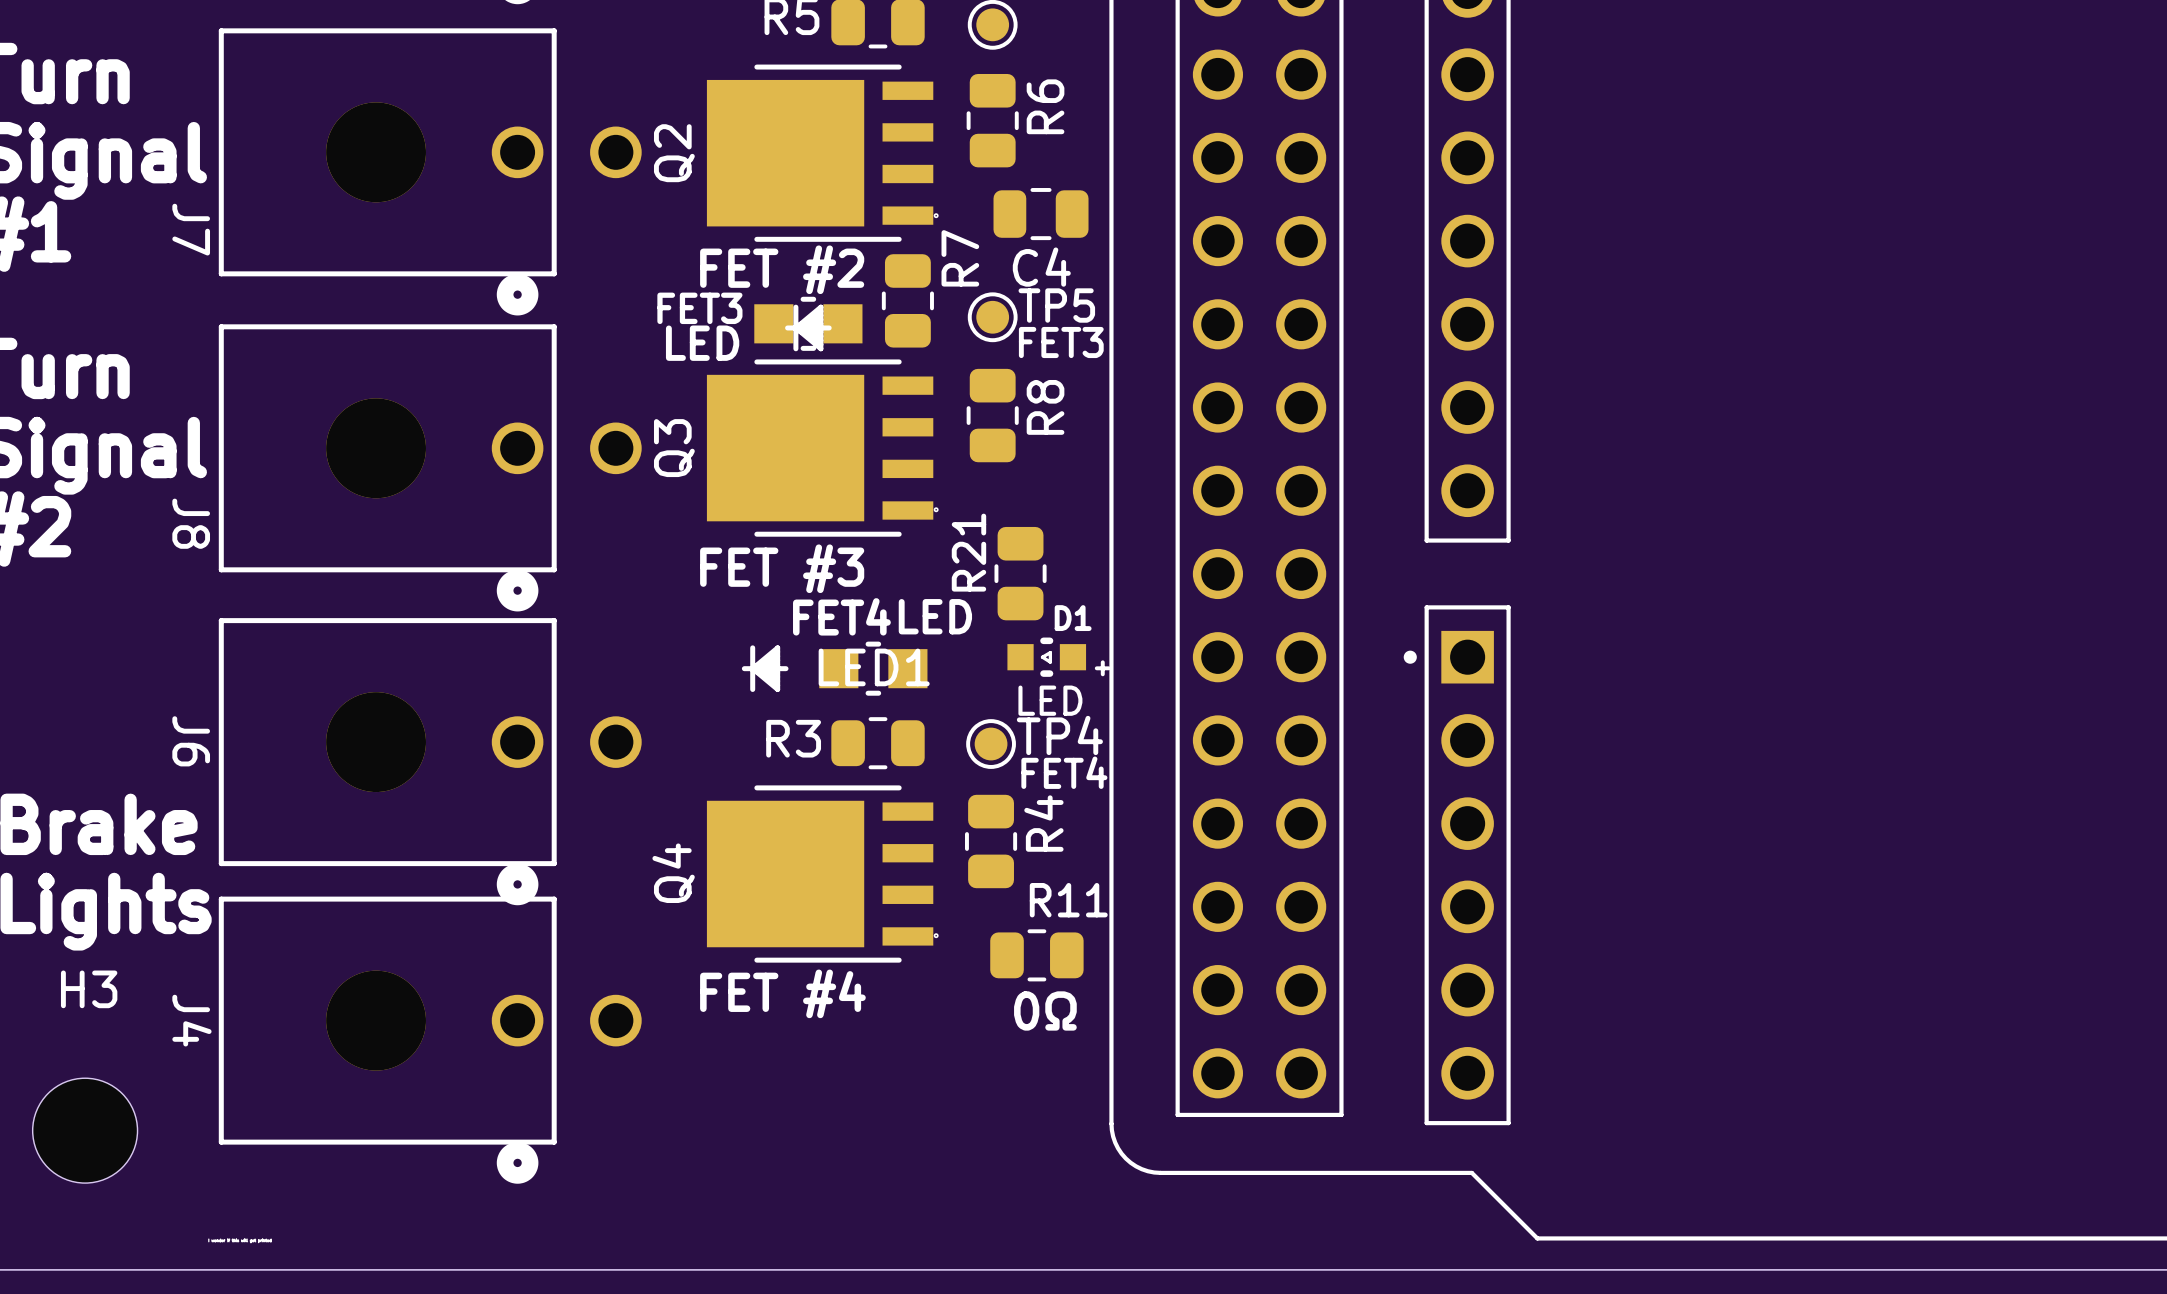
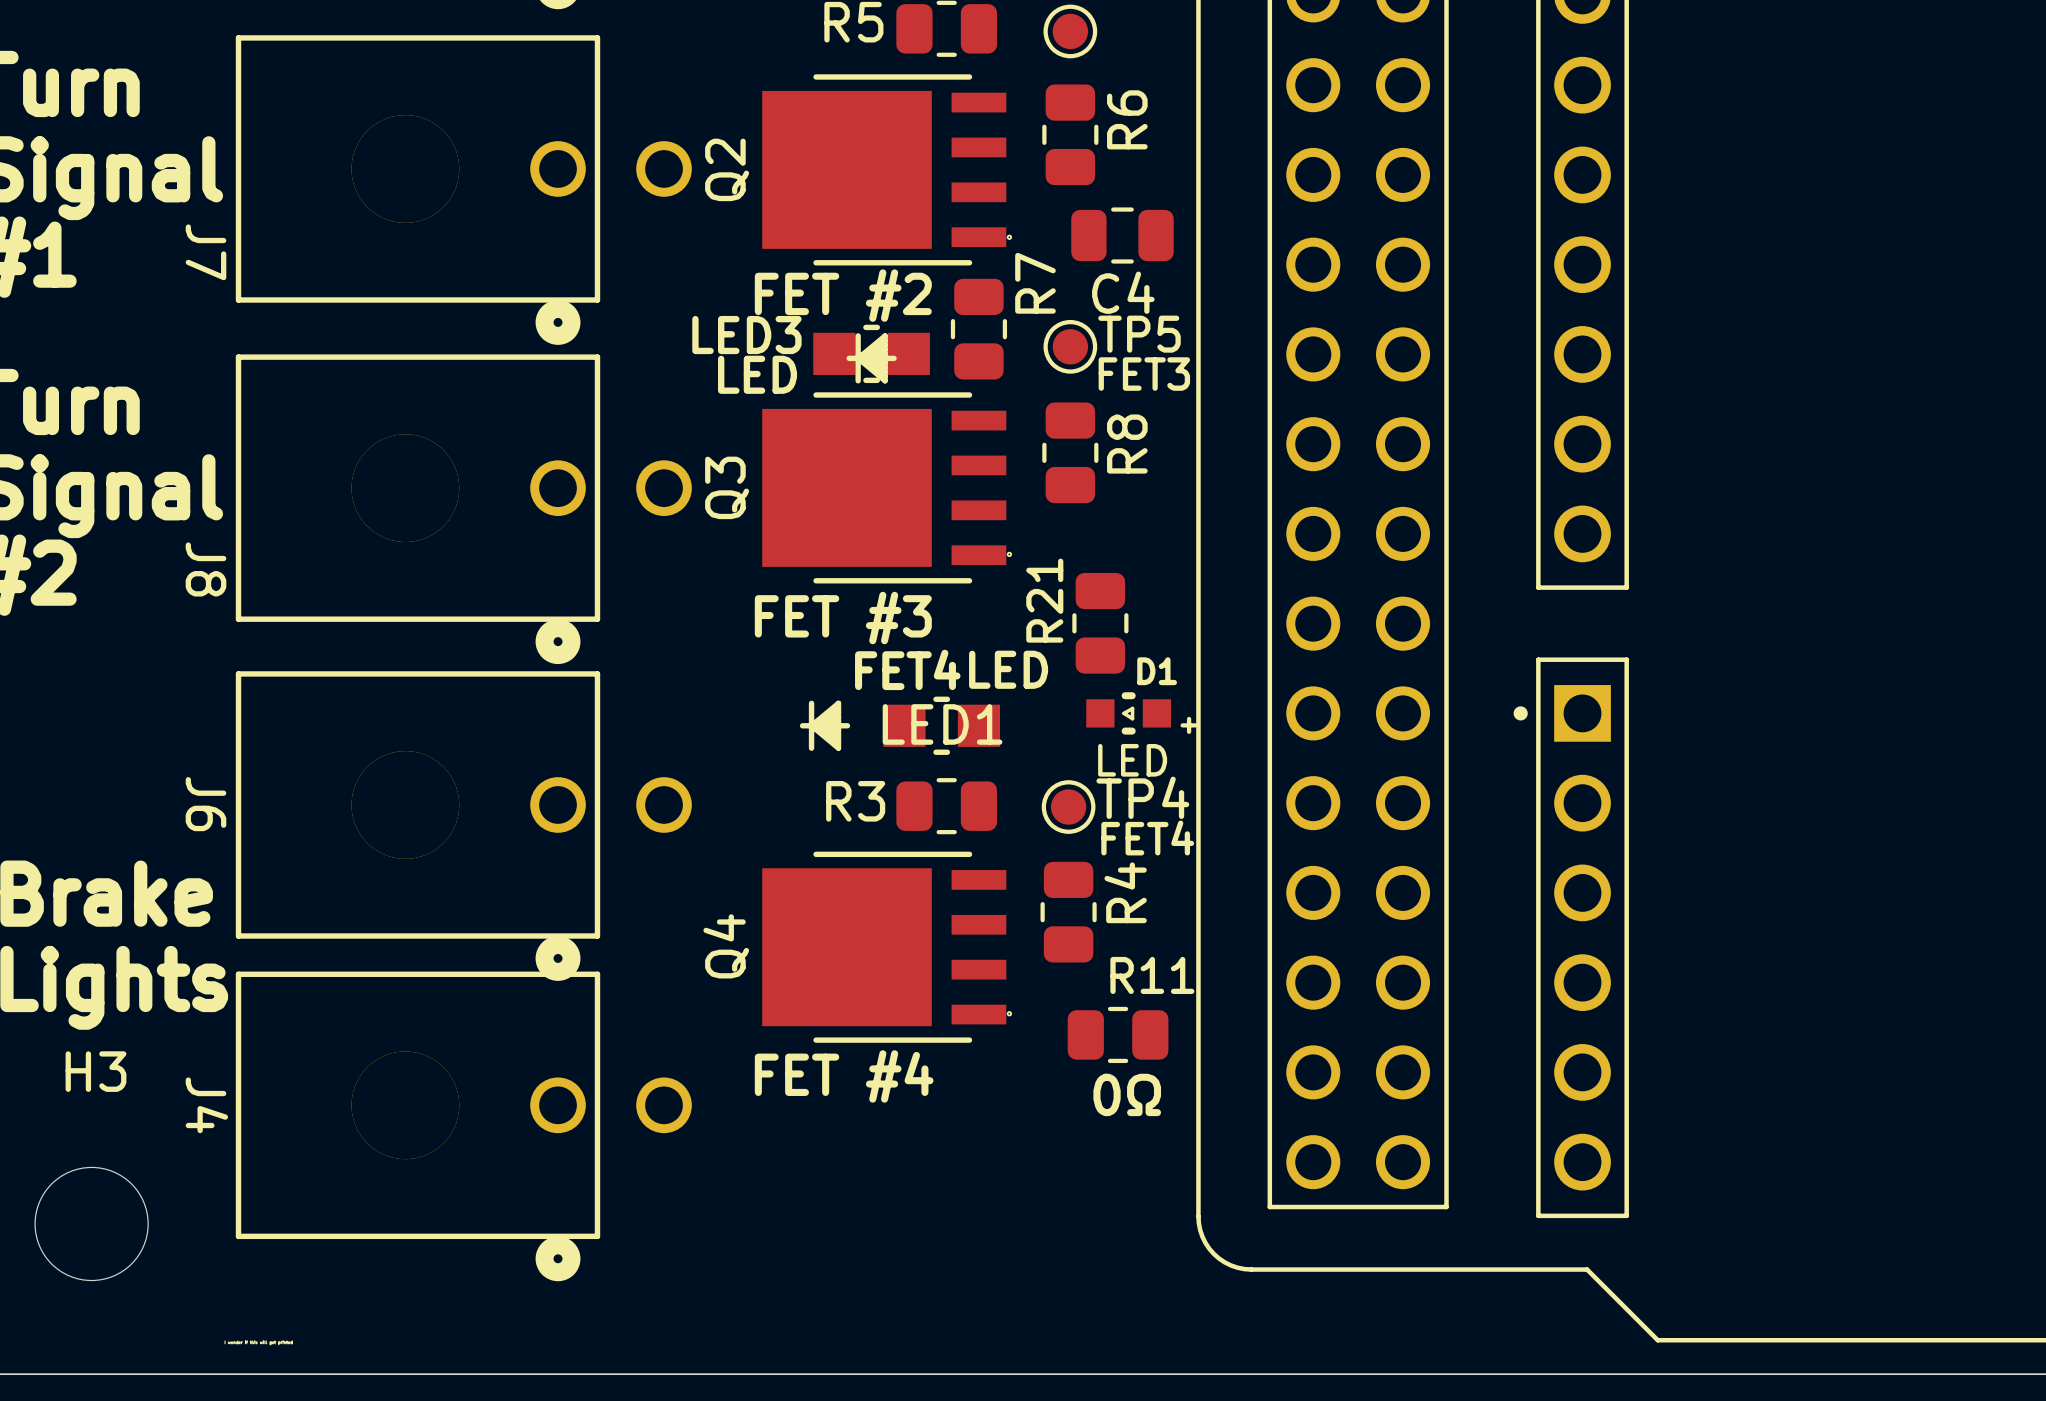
LED3 name: none -> LED3 (746, 335)
text: FET3 (699, 308) -> none

